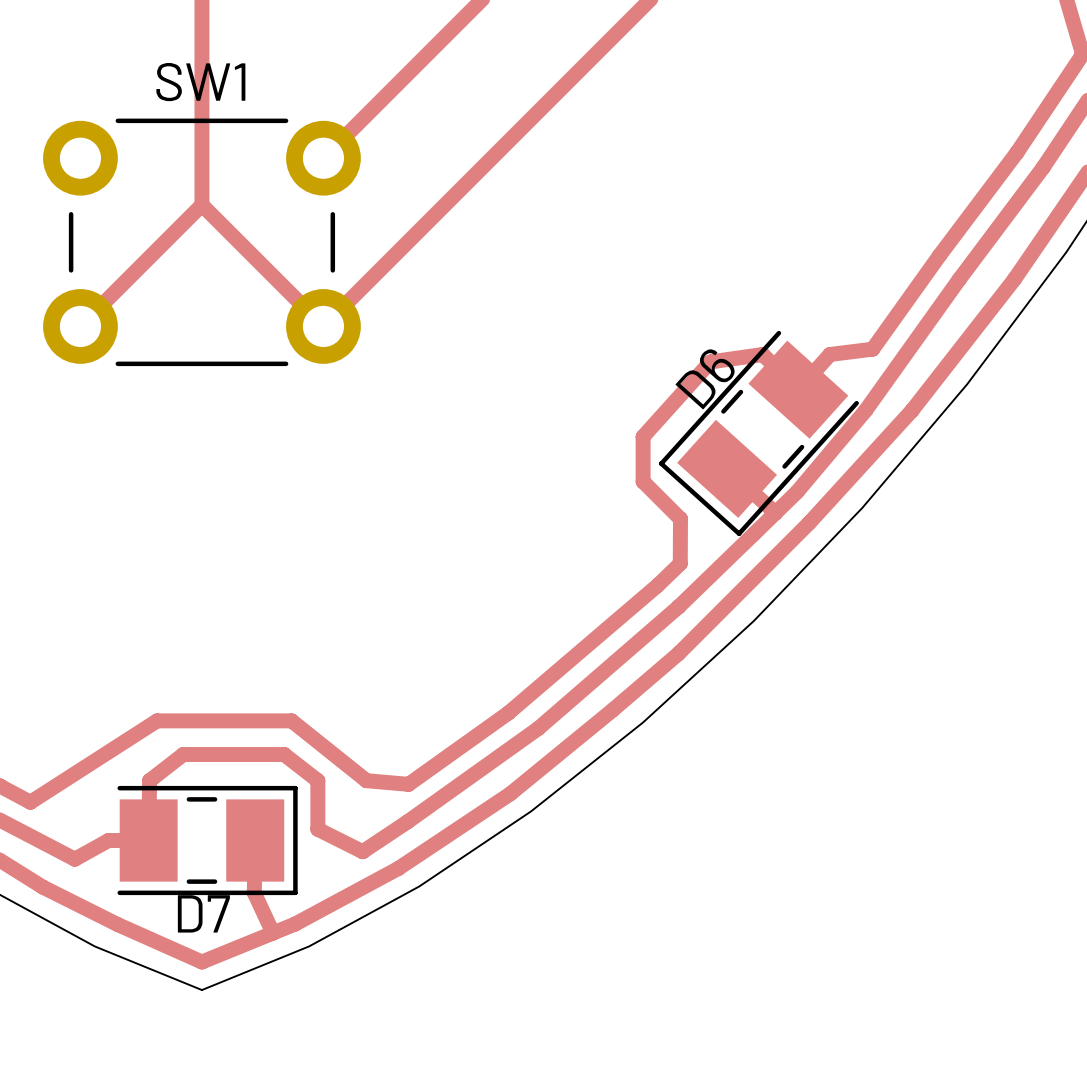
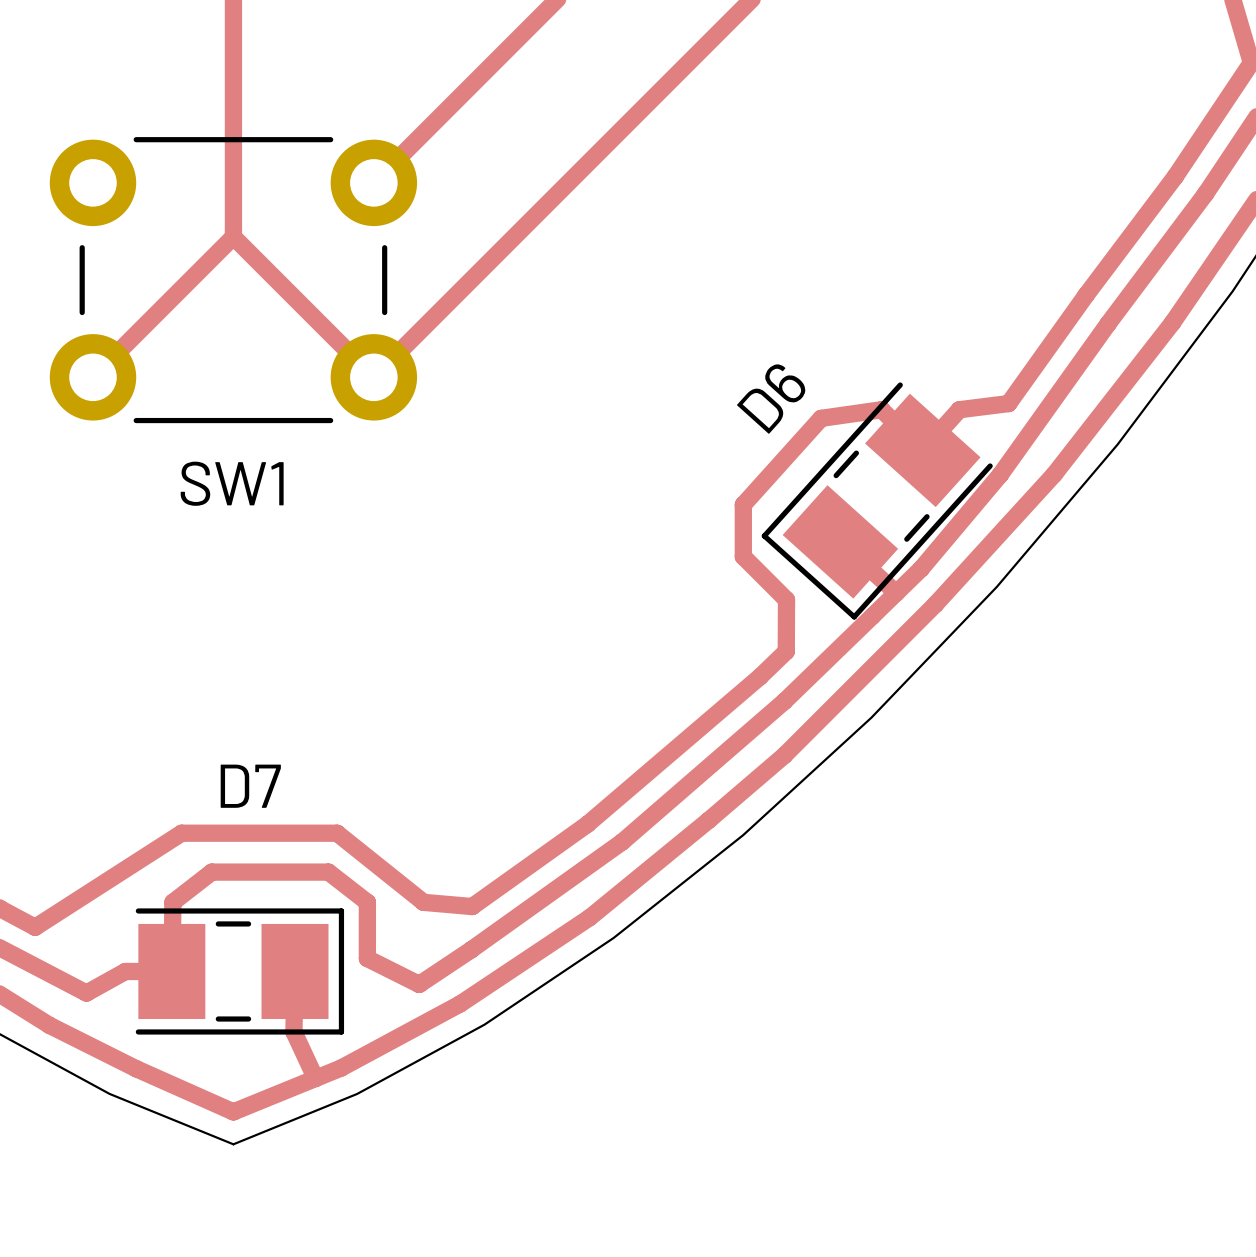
SW1 name position: SW1 (200, 82) -> SW1 (232, 483)
D6 name position: D6 (705, 379) -> D6 (771, 398)
D7 name position: D7 (203, 913) -> D7 (250, 786)

